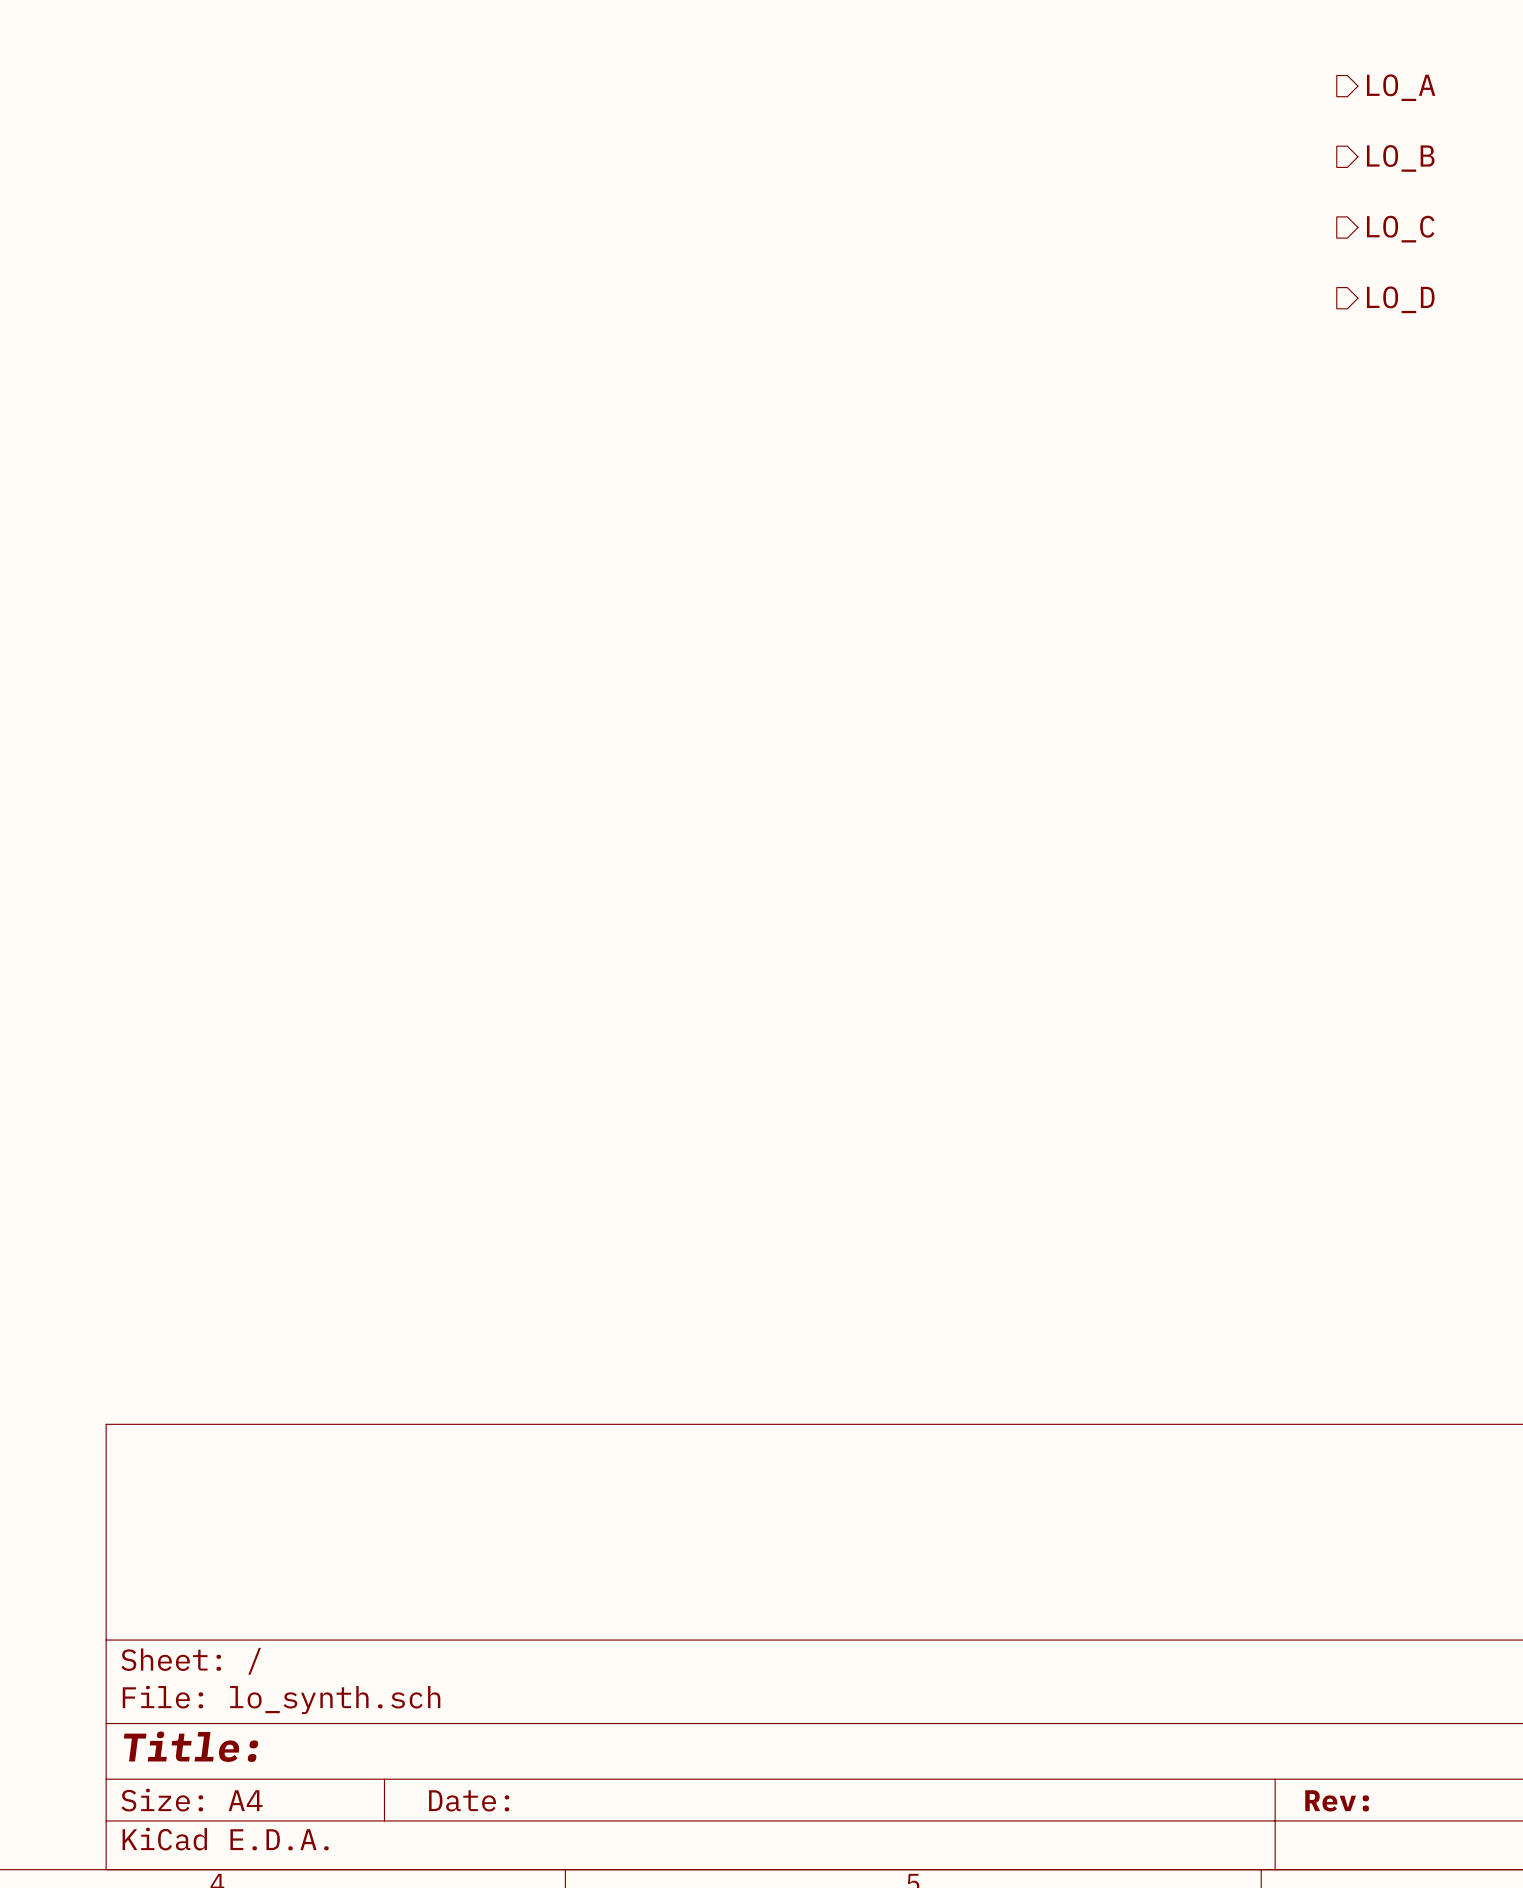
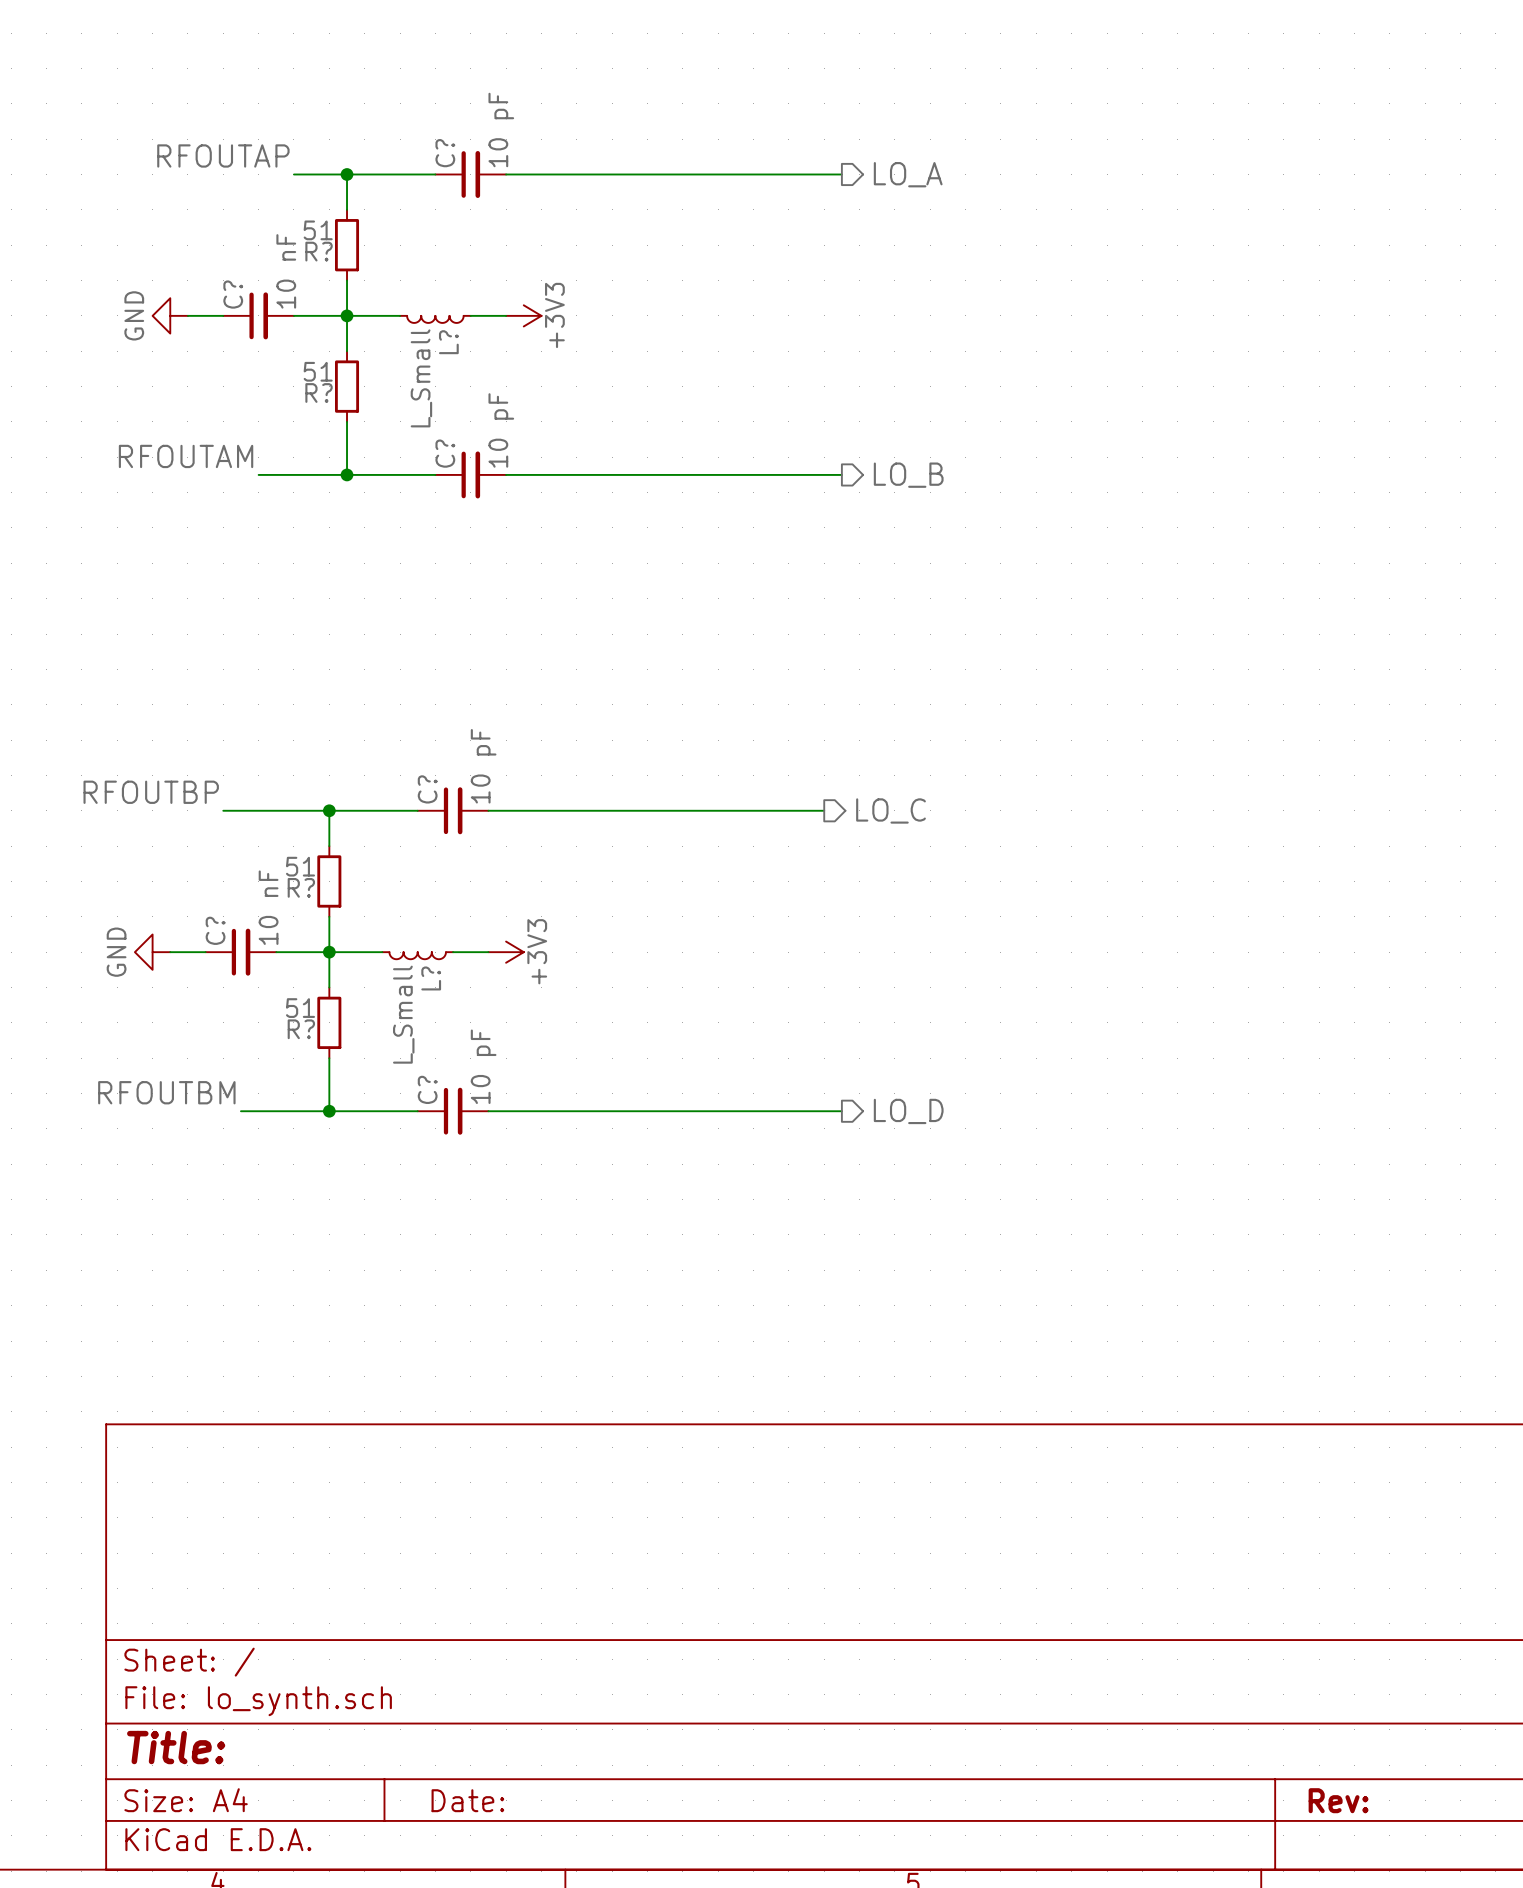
hierarchical label: LO_A (1401, 87) -> none
label: none -> RFOUTAP (223, 155)
hierarchical label: LO_B (1400, 158) -> none
wire: none -> (293, 174) (435, 174)
wire: none -> (347, 174) (347, 209)
junction: none -> (347, 174)
C?: none -> 10 pF (470, 174)
wire: none -> (506, 174) (841, 174)
hierarchical label: none -> LO_A (908, 174)
hierarchical label: LO_C (1400, 229) -> none
R?: none -> 51 (347, 245)
wire: none -> (347, 280) (347, 351)
hierarchical label: LO_D (1400, 299) -> none
power symbol: none -> GND (170, 315)
wire: none -> (187, 315) (223, 315)
C?: none -> 10 nF (258, 315)
wire: none -> (293, 315) (400, 315)
junction: none -> (347, 315)
wire: none -> (470, 315) (506, 315)
power symbol: none -> +3V3 (523, 315)
L?: none -> L_Small (435, 319)
R?: none -> 51 (347, 386)
wire: none -> (347, 421) (347, 474)
label: none -> RFOUTAM (186, 456)
wire: none -> (258, 474) (435, 474)
junction: none -> (347, 474)
C?: none -> 10 pF (470, 474)
wire: none -> (506, 474) (841, 474)
hierarchical label: none -> LO_B (908, 475)
label: none -> RFOUTBP (151, 792)
wire: none -> (223, 810) (417, 810)
wire: none -> (329, 810) (329, 846)
junction: none -> (329, 810)
C?: none -> 10 pF (453, 810)
wire: none -> (488, 810) (824, 810)
hierarchical label: none -> LO_C (891, 810)
R?: none -> 51 (329, 881)
wire: none -> (329, 916) (329, 987)
power symbol: none -> GND (152, 952)
wire: none -> (170, 952) (205, 952)
C?: none -> 10 nF (240, 952)
wire: none -> (276, 952) (382, 952)
junction: none -> (329, 952)
wire: none -> (453, 952) (488, 952)
power symbol: none -> +3V3 (506, 952)
L?: none -> L_Small (417, 955)
R?: none -> 51 (329, 1022)
wire: none -> (329, 1058) (329, 1111)
label: none -> RFOUTBM (166, 1092)
wire: none -> (240, 1111) (417, 1111)
junction: none -> (329, 1111)
C?: none -> 10 pF (453, 1111)
wire: none -> (488, 1111) (841, 1111)
hierarchical label: none -> LO_D (908, 1111)

